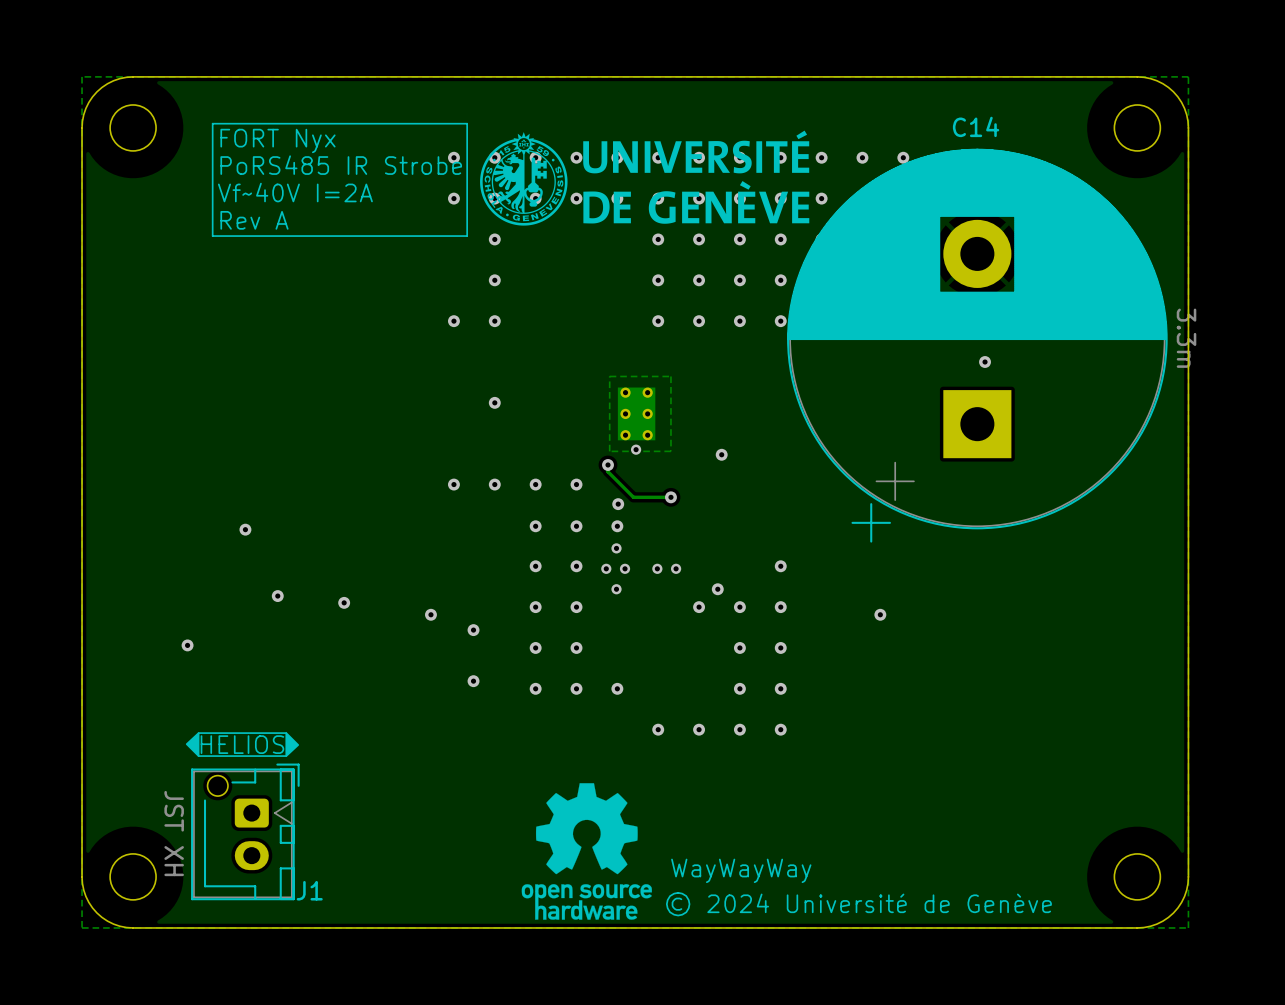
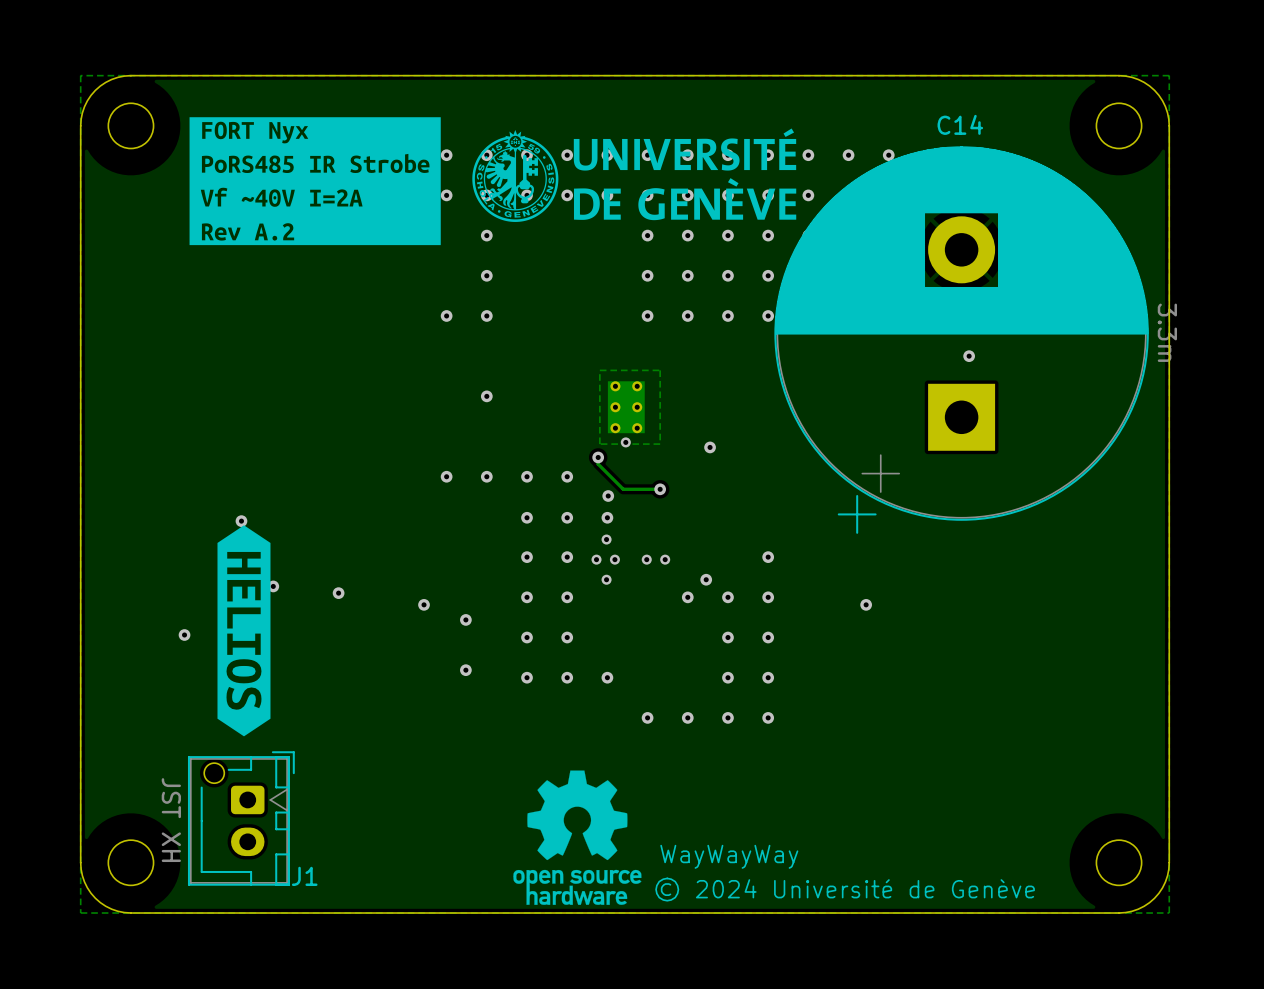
drawing: none -> [189, 117, 441, 246]
line: (467, 123) (212, 123) (212, 236) (467, 236) (467, 123) -> none
text: FORT Nyx (277, 140) -> none
text: PoRS485 IR Strobe (341, 165) -> none
text: Vf~40V I=2A (295, 192) -> none
text: Rev A (254, 220) -> none
drawing: none -> [217, 525, 271, 737]
drawing: [185, 732, 200, 757] -> none
drawing: [285, 732, 300, 757] -> none
line: (286, 733) (198, 733) -> none
text: HELIOS (242, 744) -> none
line: (286, 756) (198, 756) -> none

